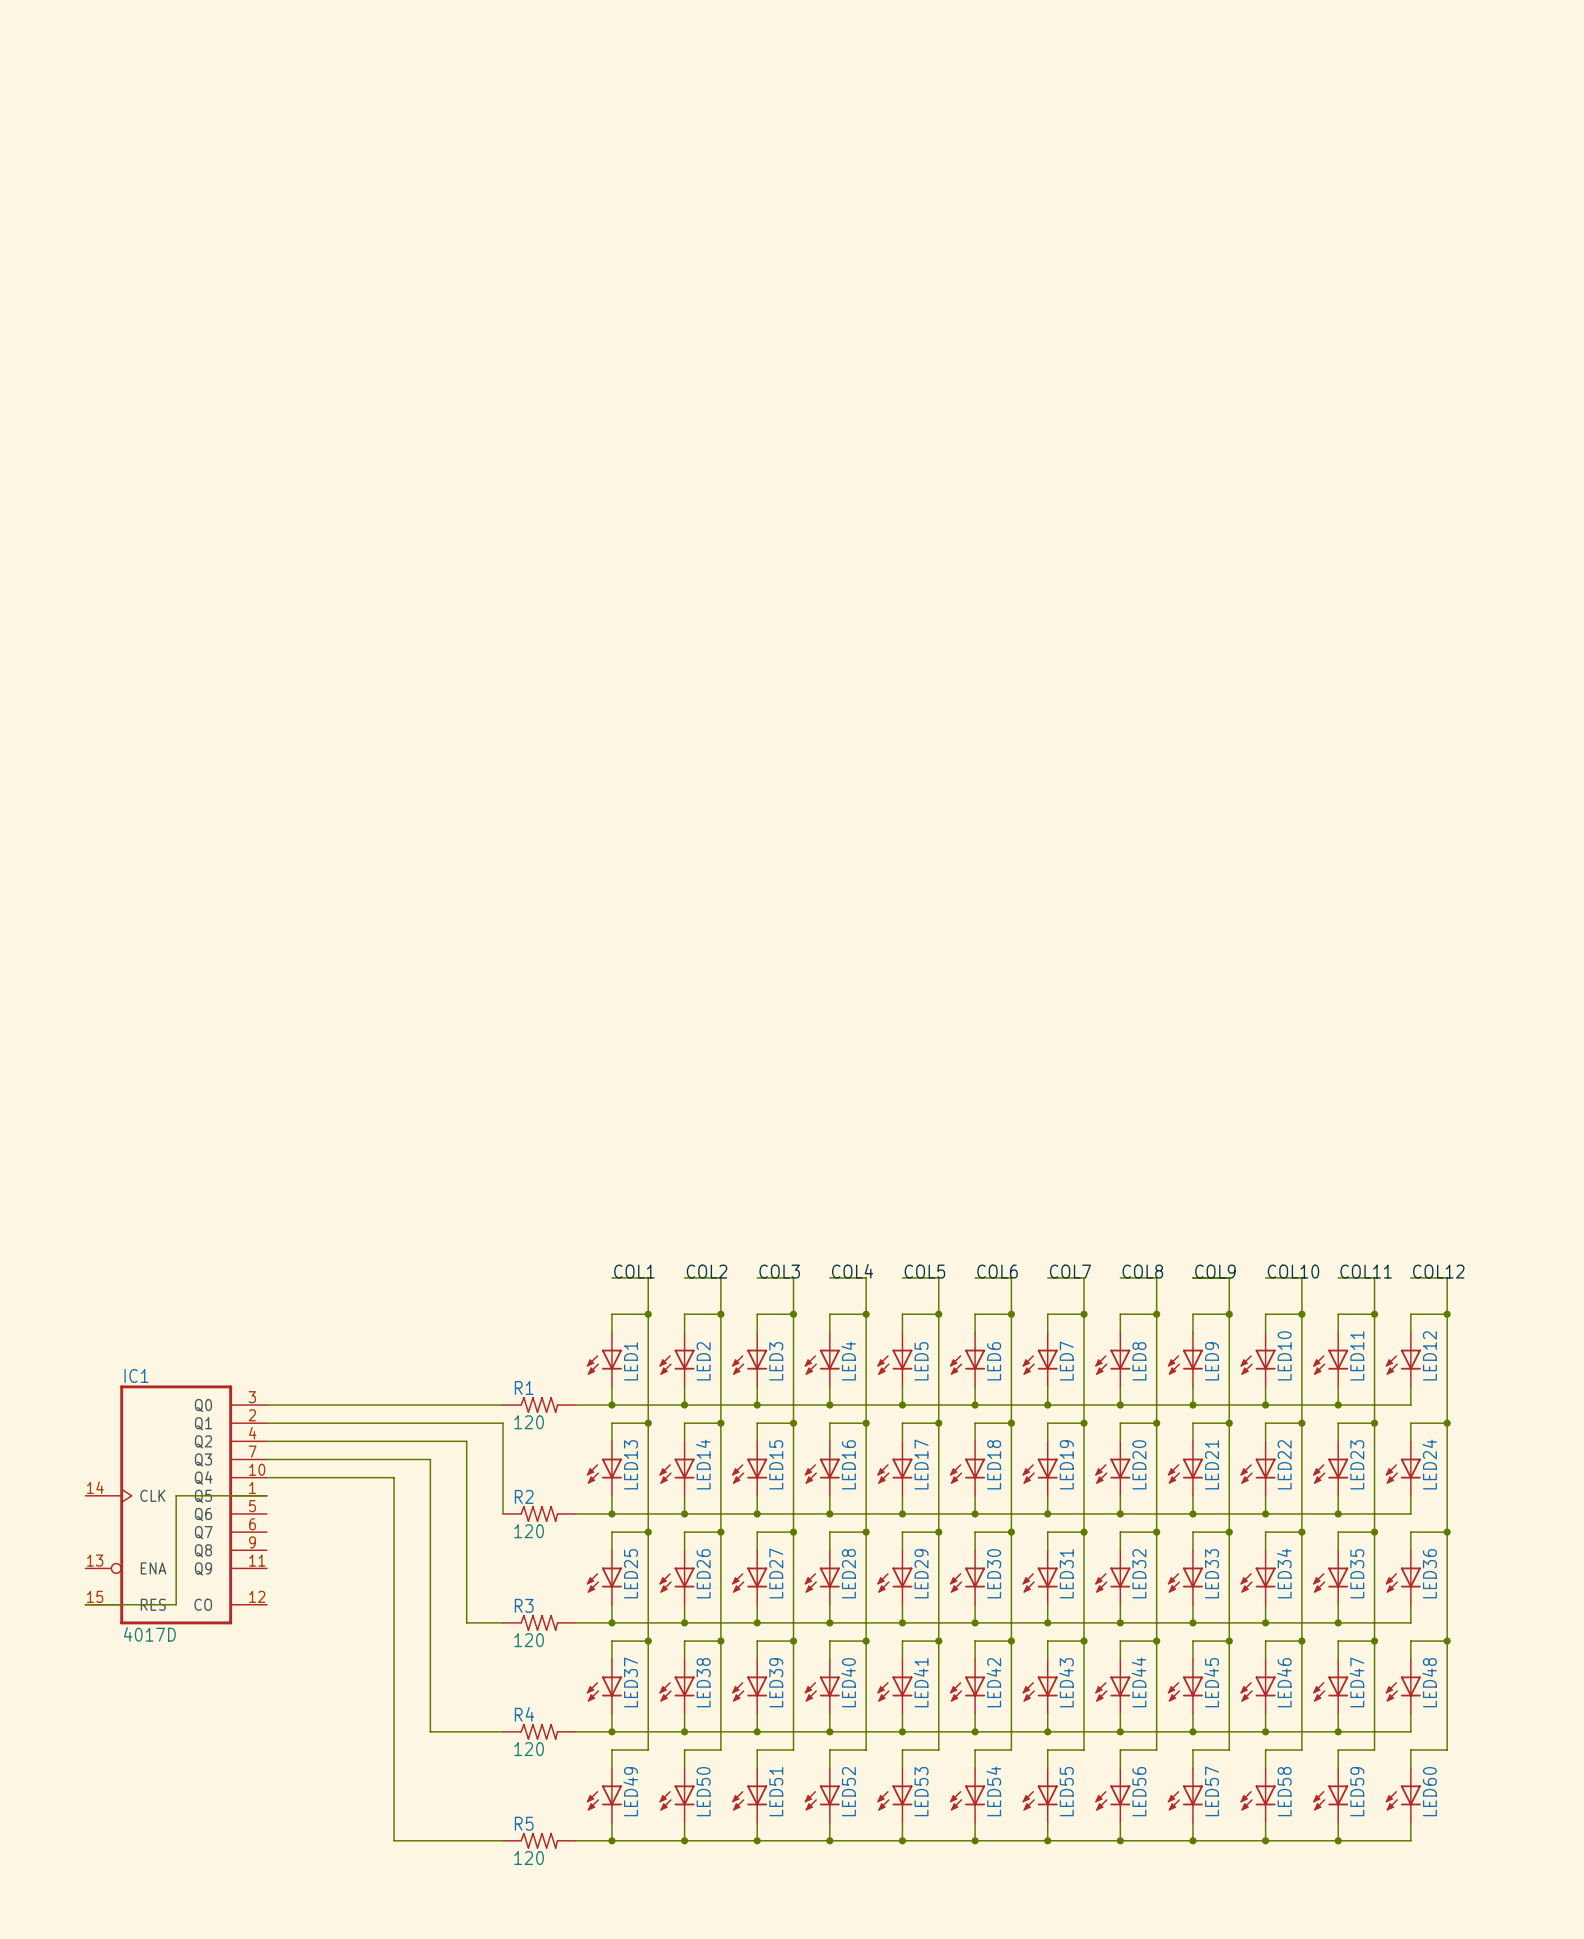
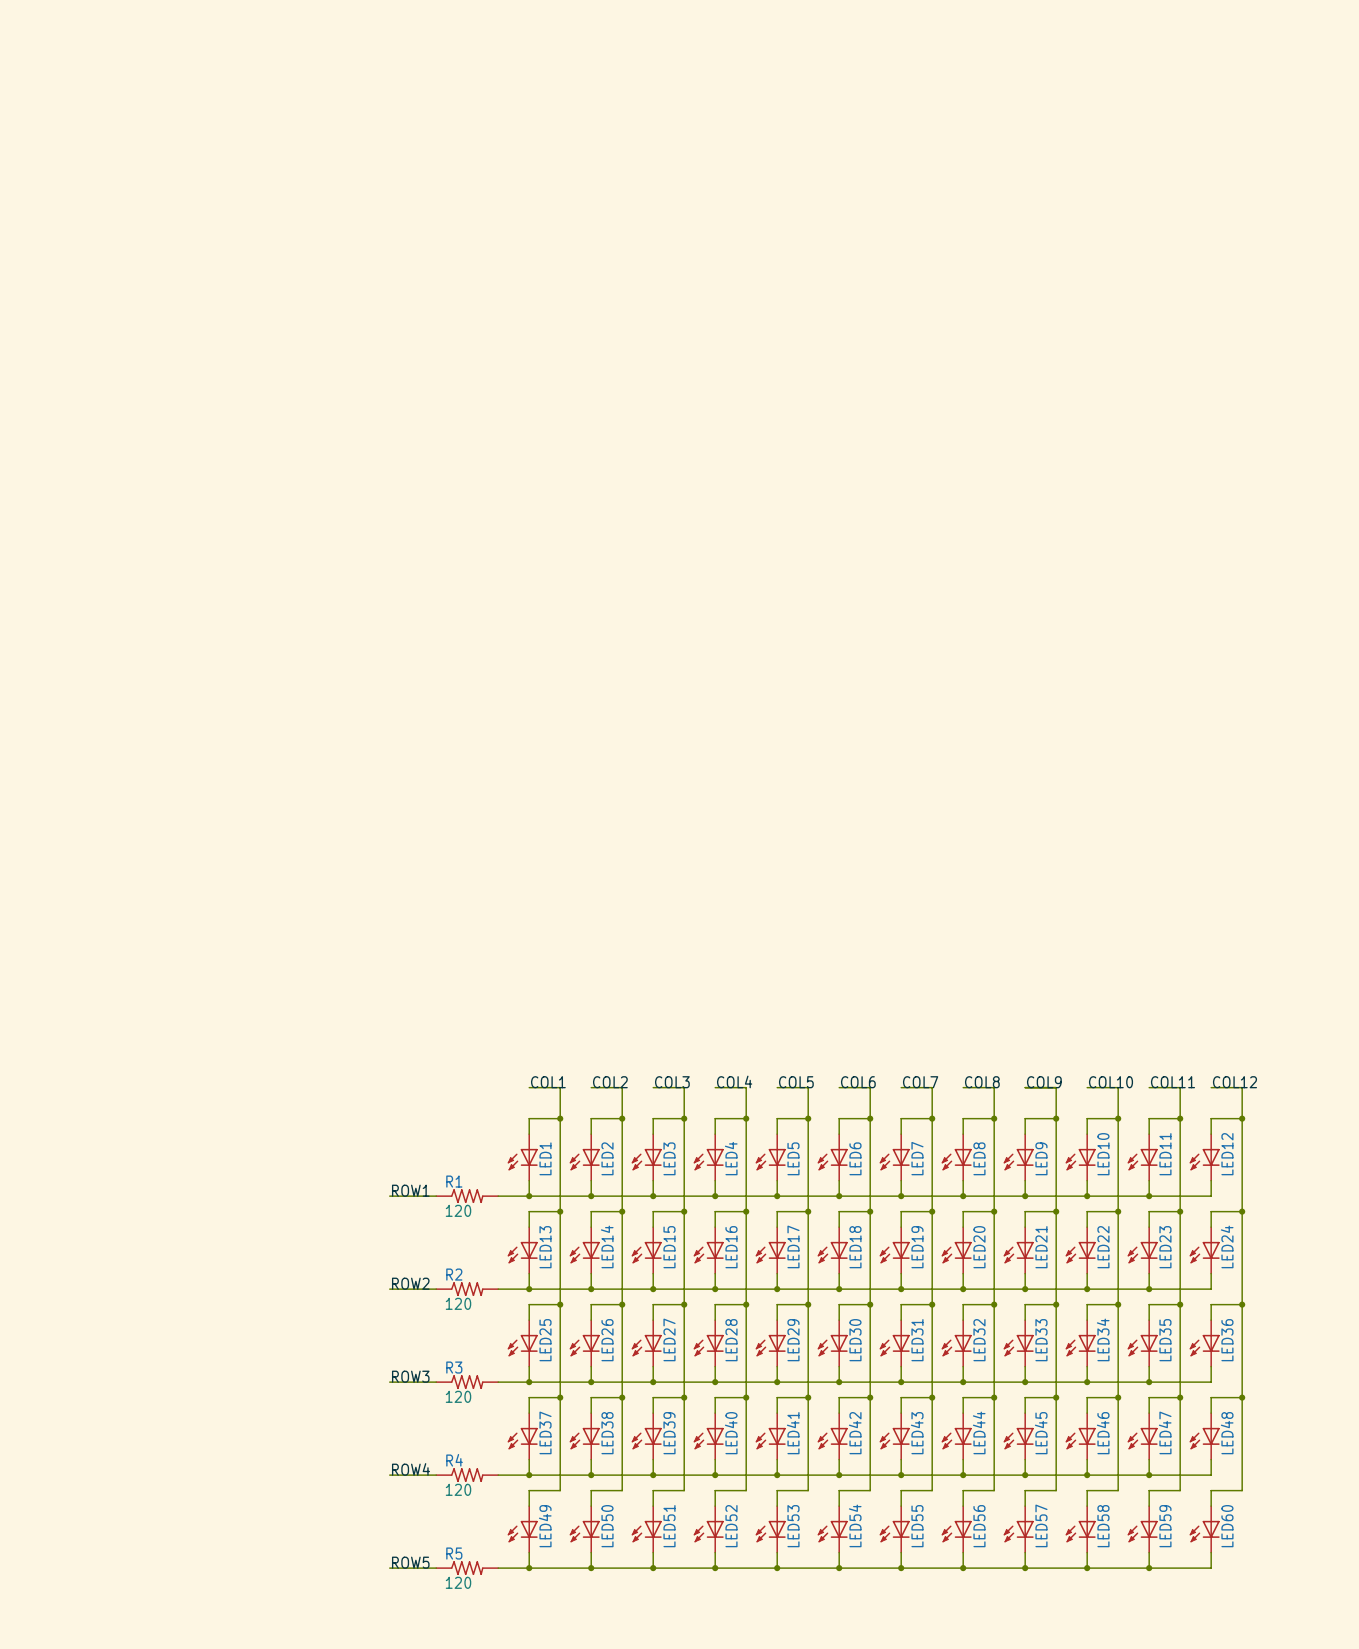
label: none -> ROW1 (410, 1190)
wire: (266, 1405) (448, 1405) -> none
wire: (266, 1423) (503, 1423) (503, 1513) -> (389, 1289) (436, 1289)
wire: (266, 1441) (466, 1441) (466, 1622) -> (389, 1382) (405, 1382)
wire: (266, 1459) (430, 1459) (430, 1731) (448, 1731) -> none
wire: (266, 1477) (394, 1477) (394, 1840) (448, 1840) -> none
wire: (266, 1495) (176, 1495) (176, 1604) (85, 1604) -> none
IC1: 4017D (176, 1504) -> none
label: none -> ROW2 (410, 1283)
label: none -> ROW3 (410, 1376)
label: none -> ROW4 (411, 1469)
label: none -> ROW5 (410, 1562)

